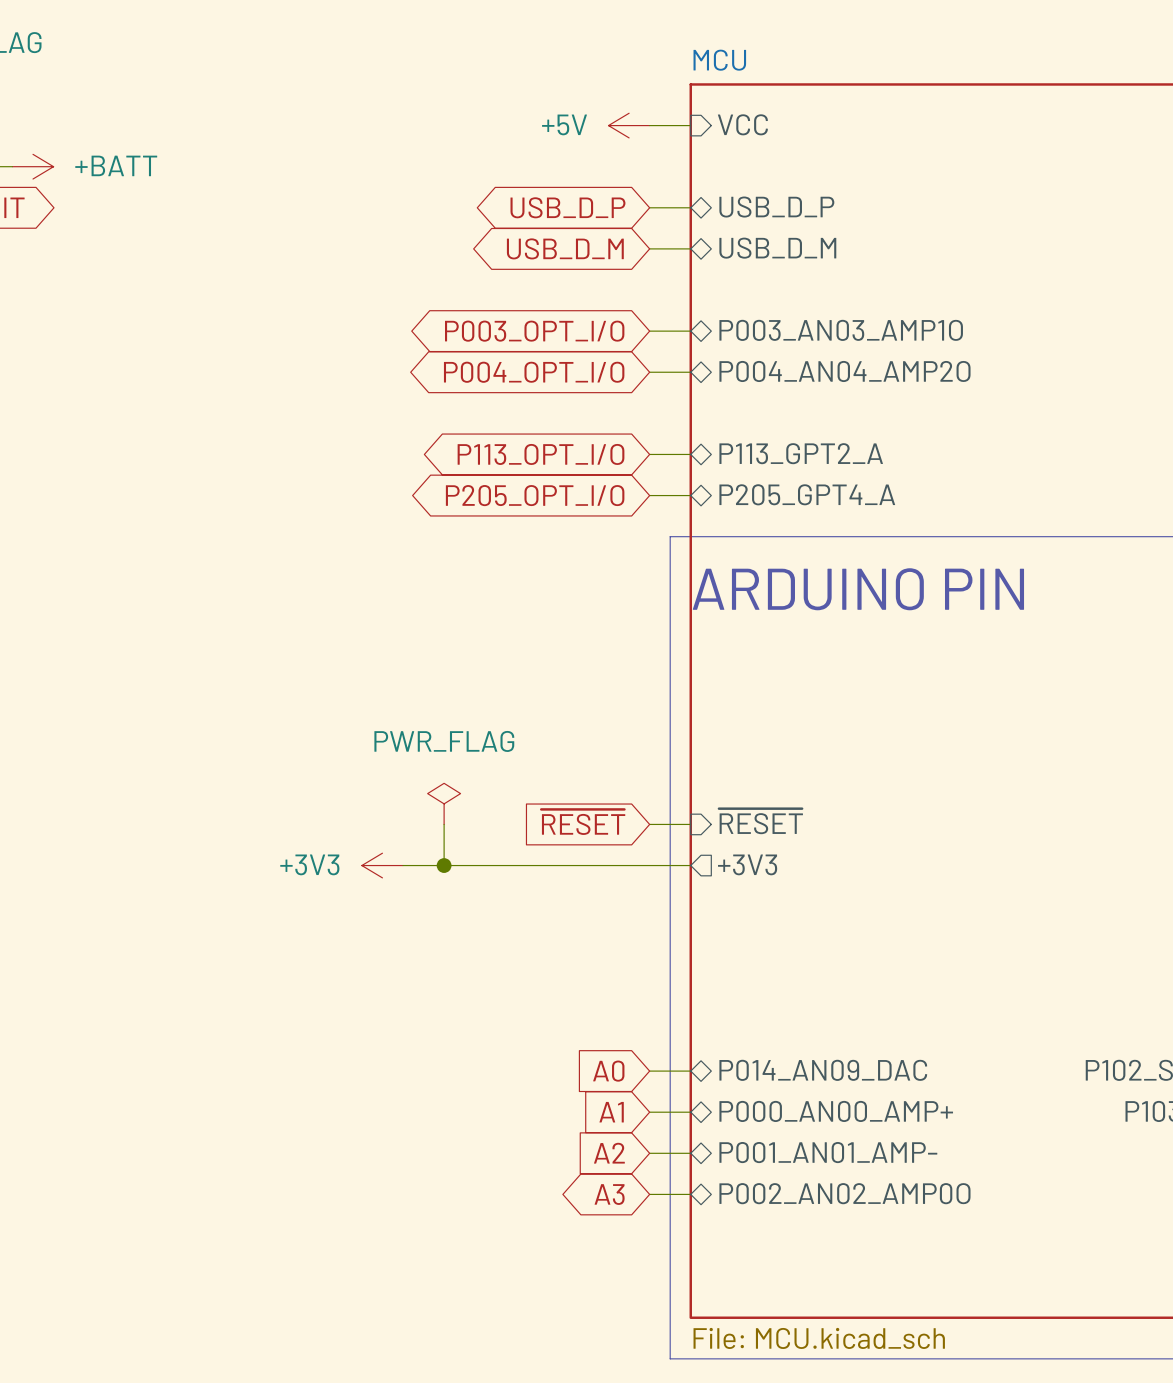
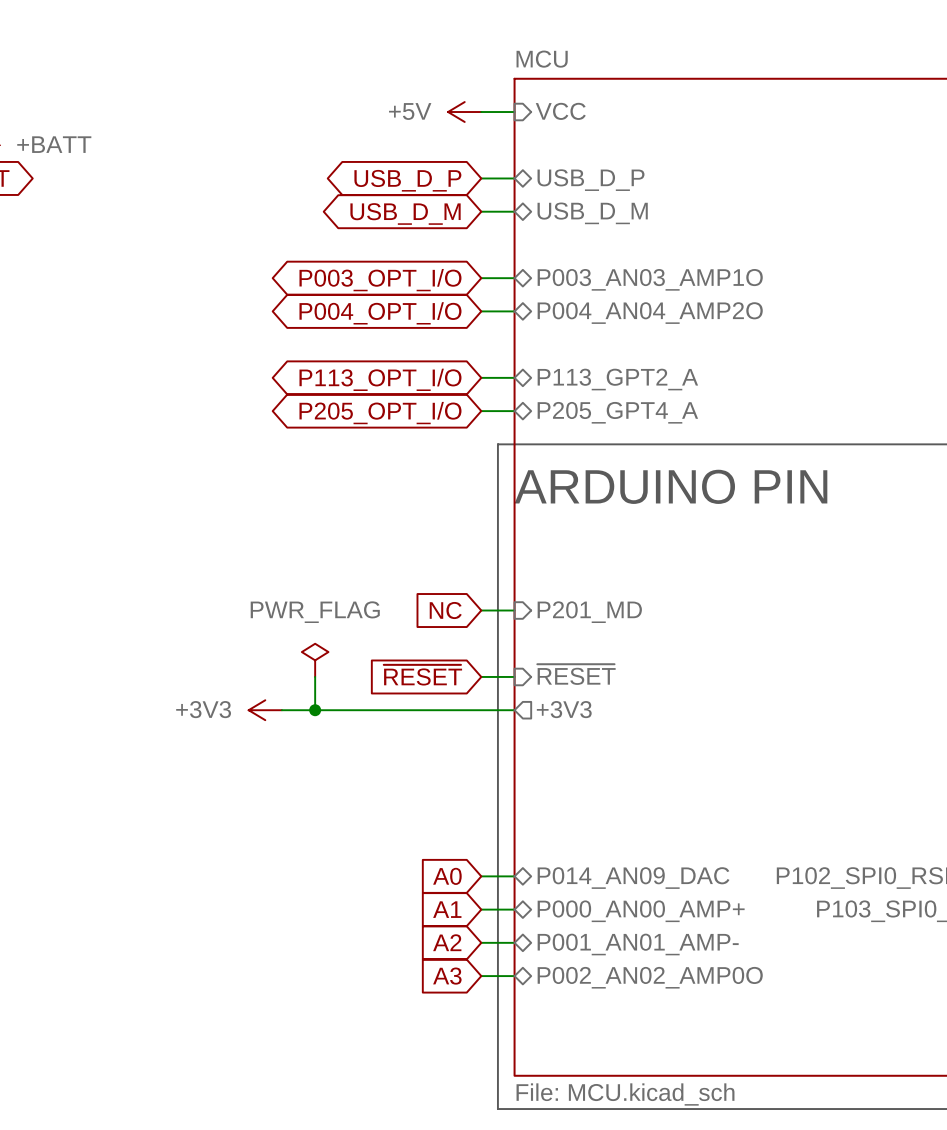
sheet pin: none -> P201_MD (589, 612)
global label: none -> NC (445, 610)
wire: none -> (481, 610) (514, 610)
global label shape: bidirectional (609, 1194) -> input (447, 976)

